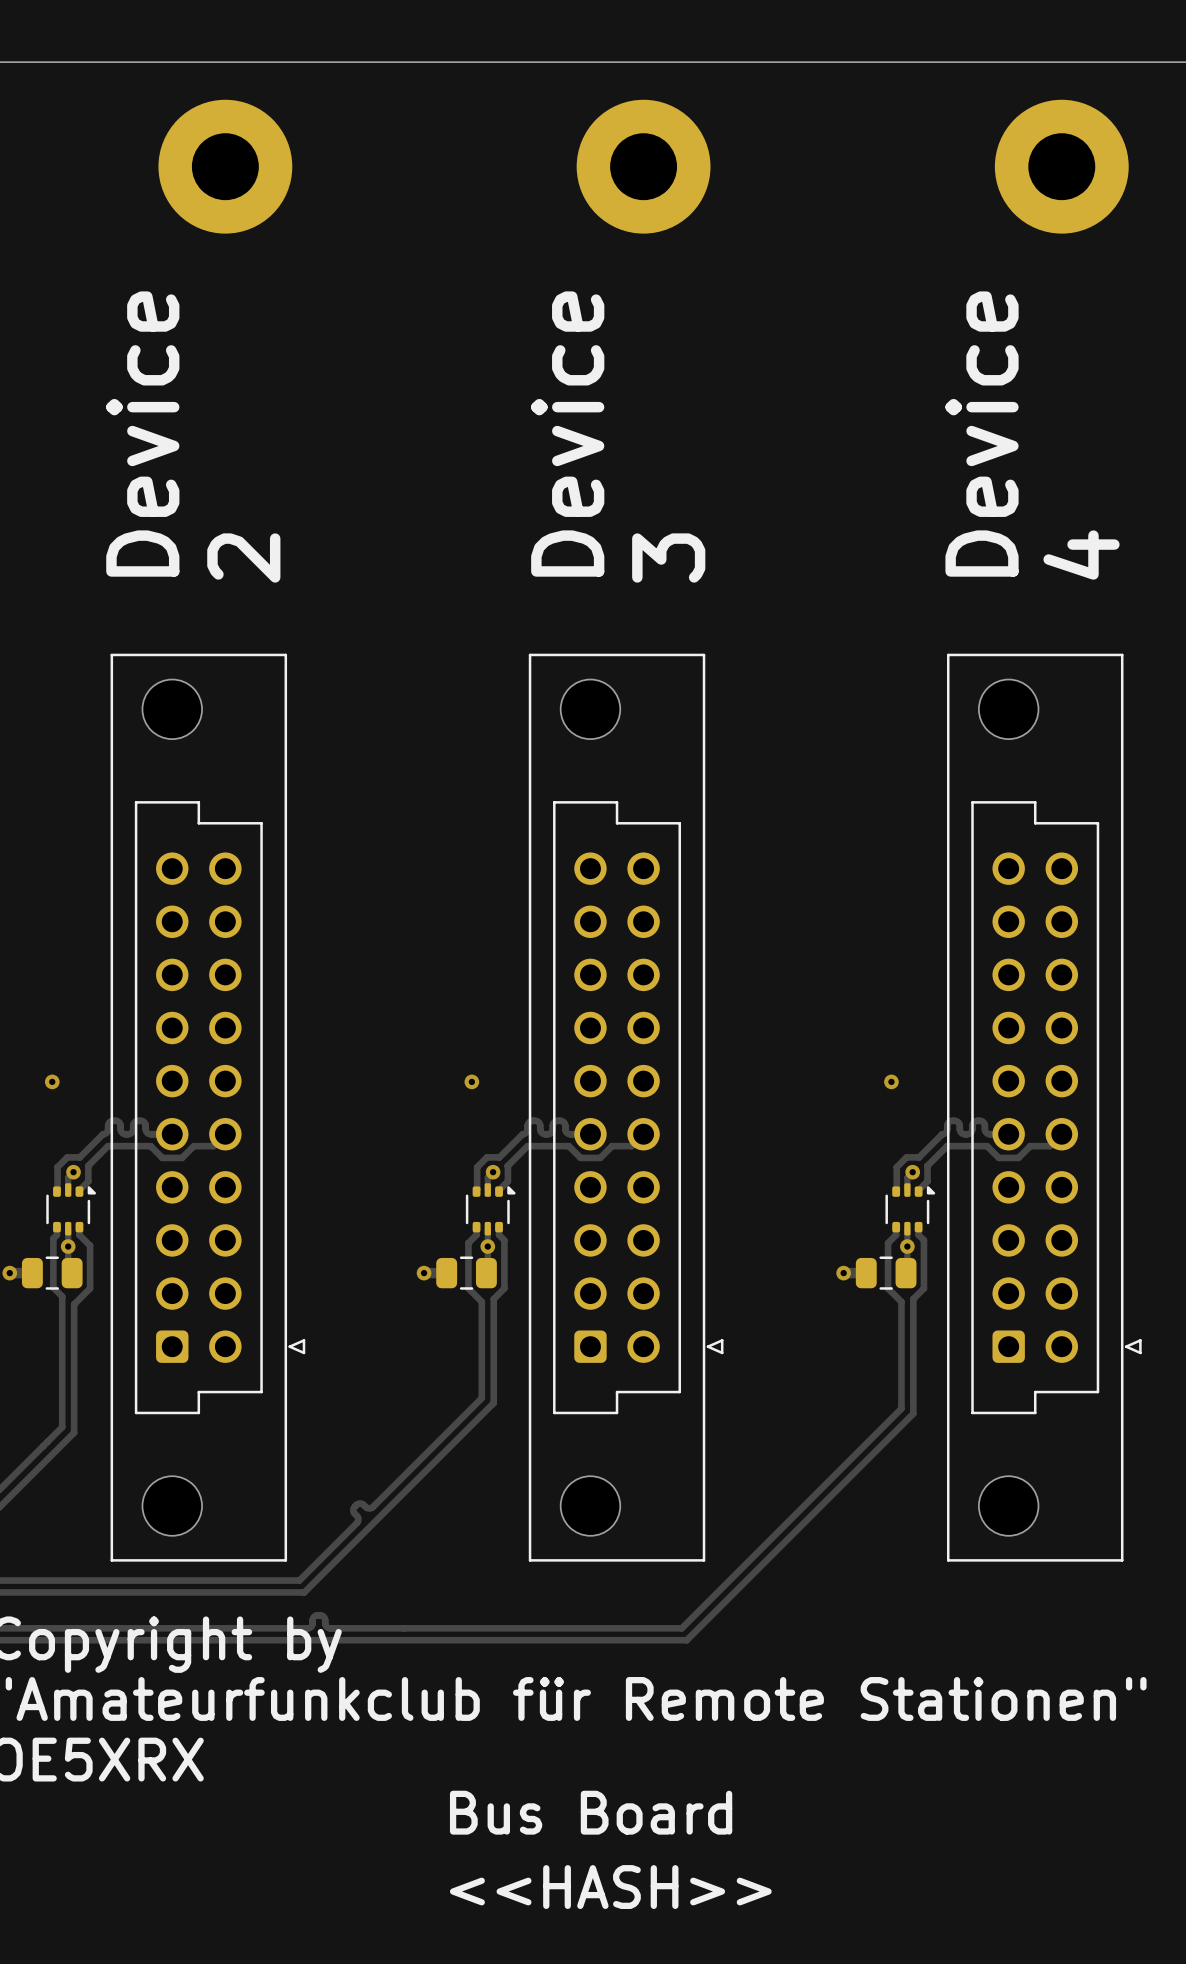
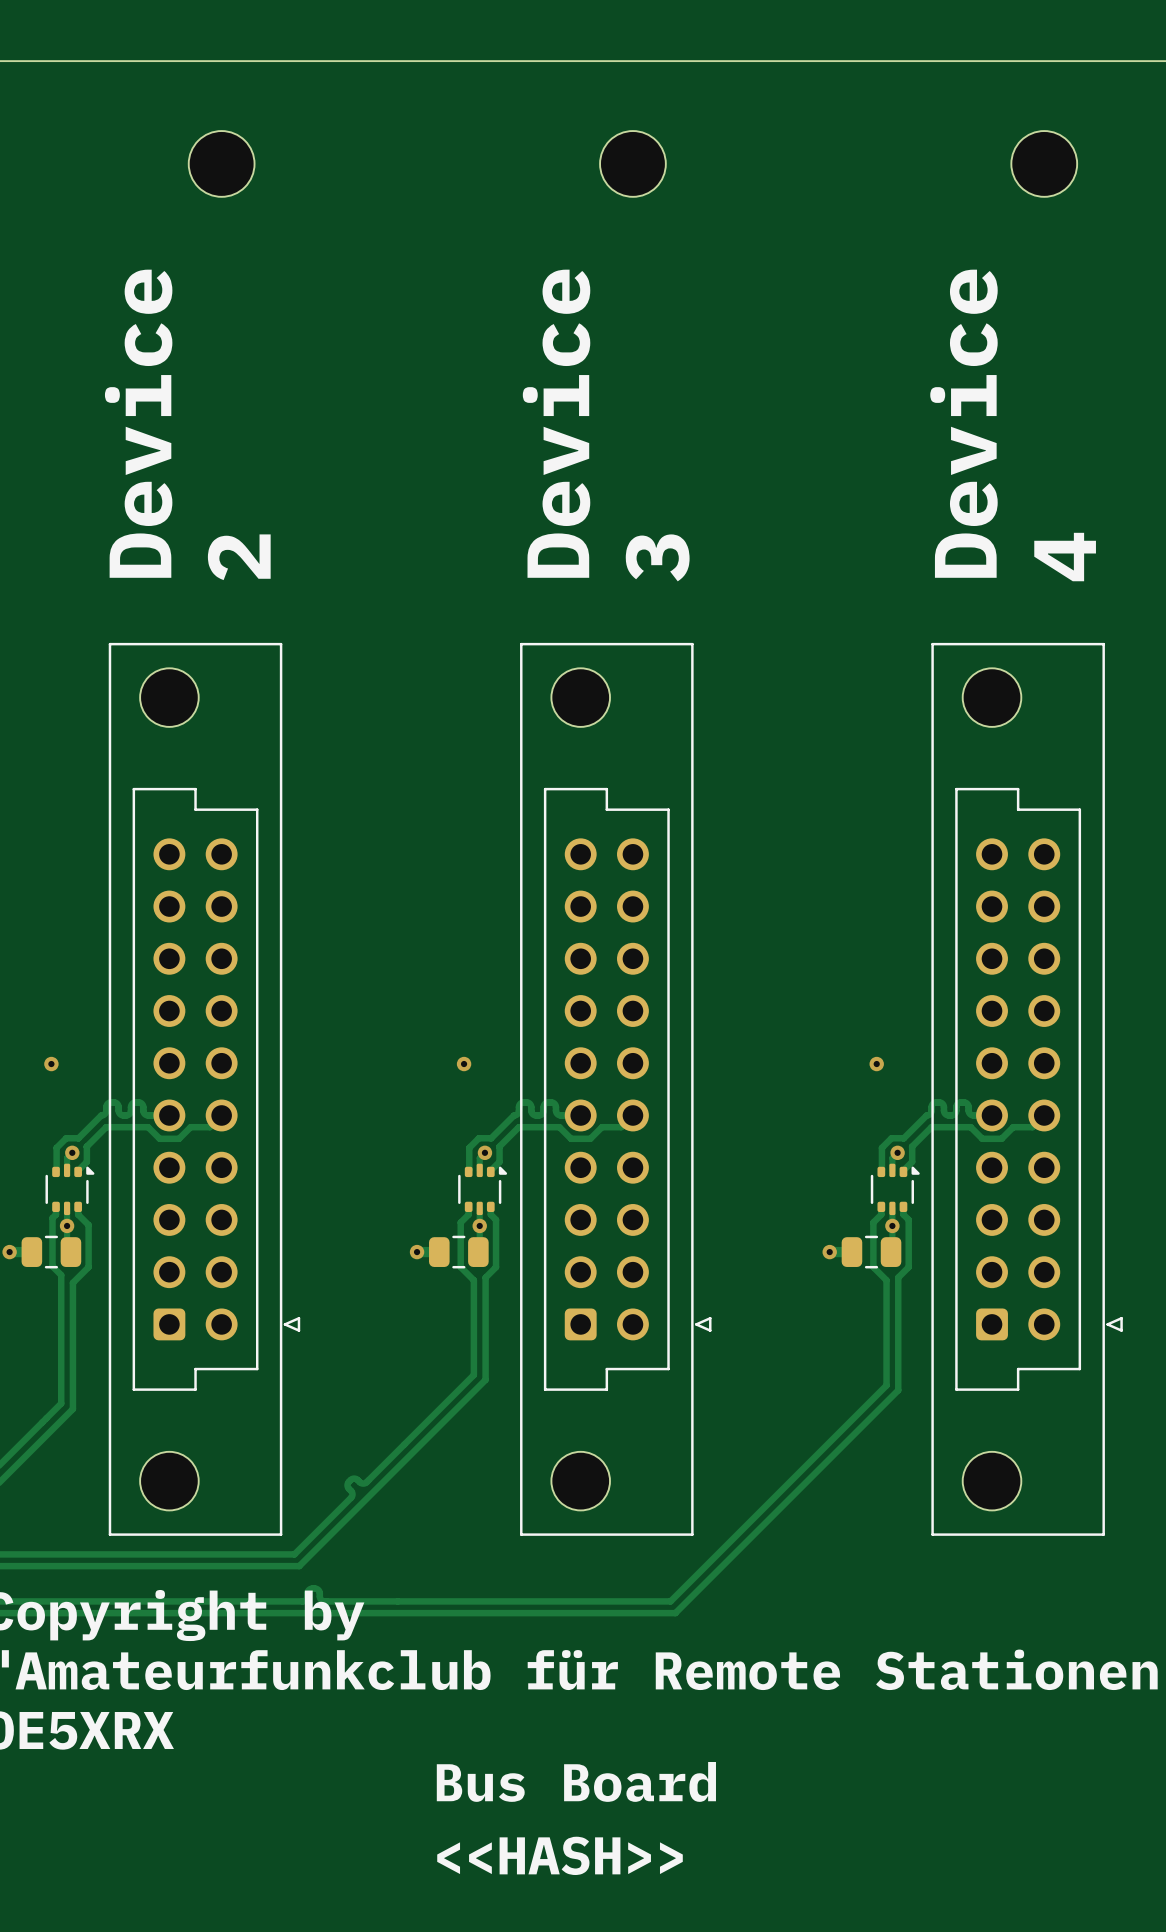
part footprint: [158, 99, 293, 234] -> [188, 131, 255, 197]
part footprint: [576, 99, 711, 234] -> [600, 131, 666, 197]
part footprint: [994, 99, 1129, 234] -> [1011, 131, 1078, 197]

